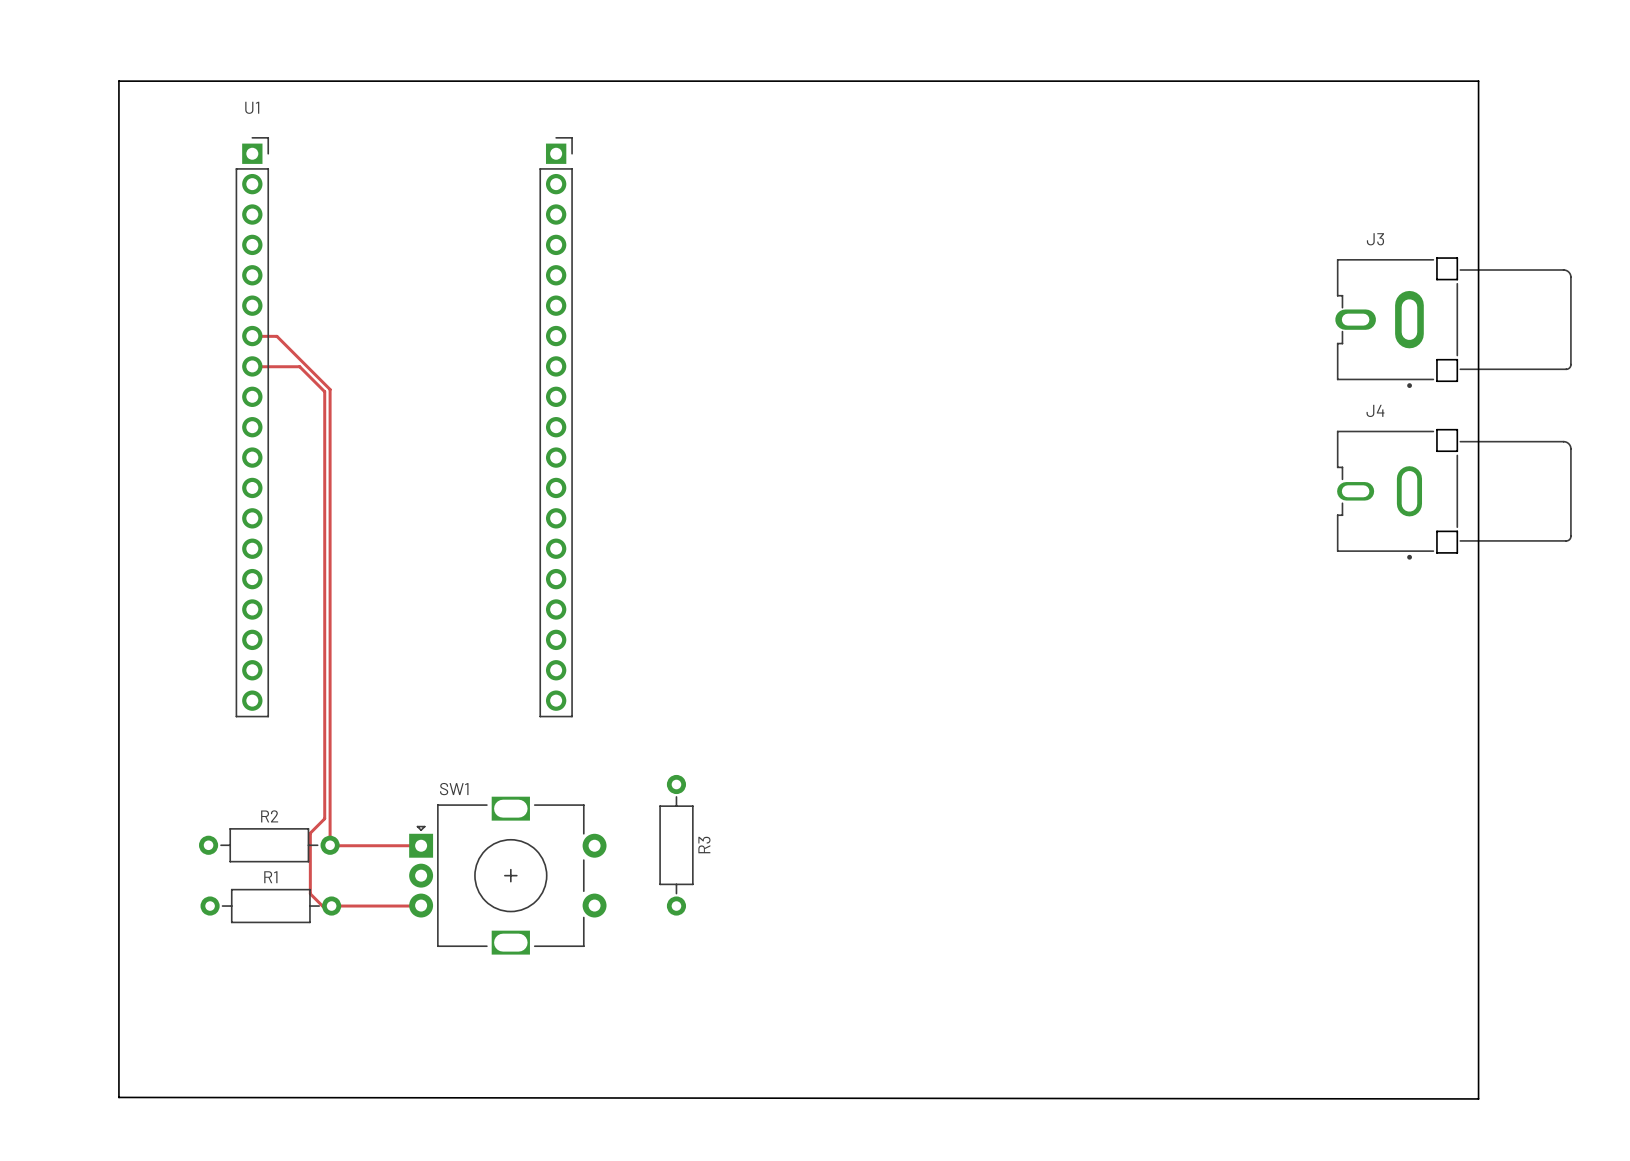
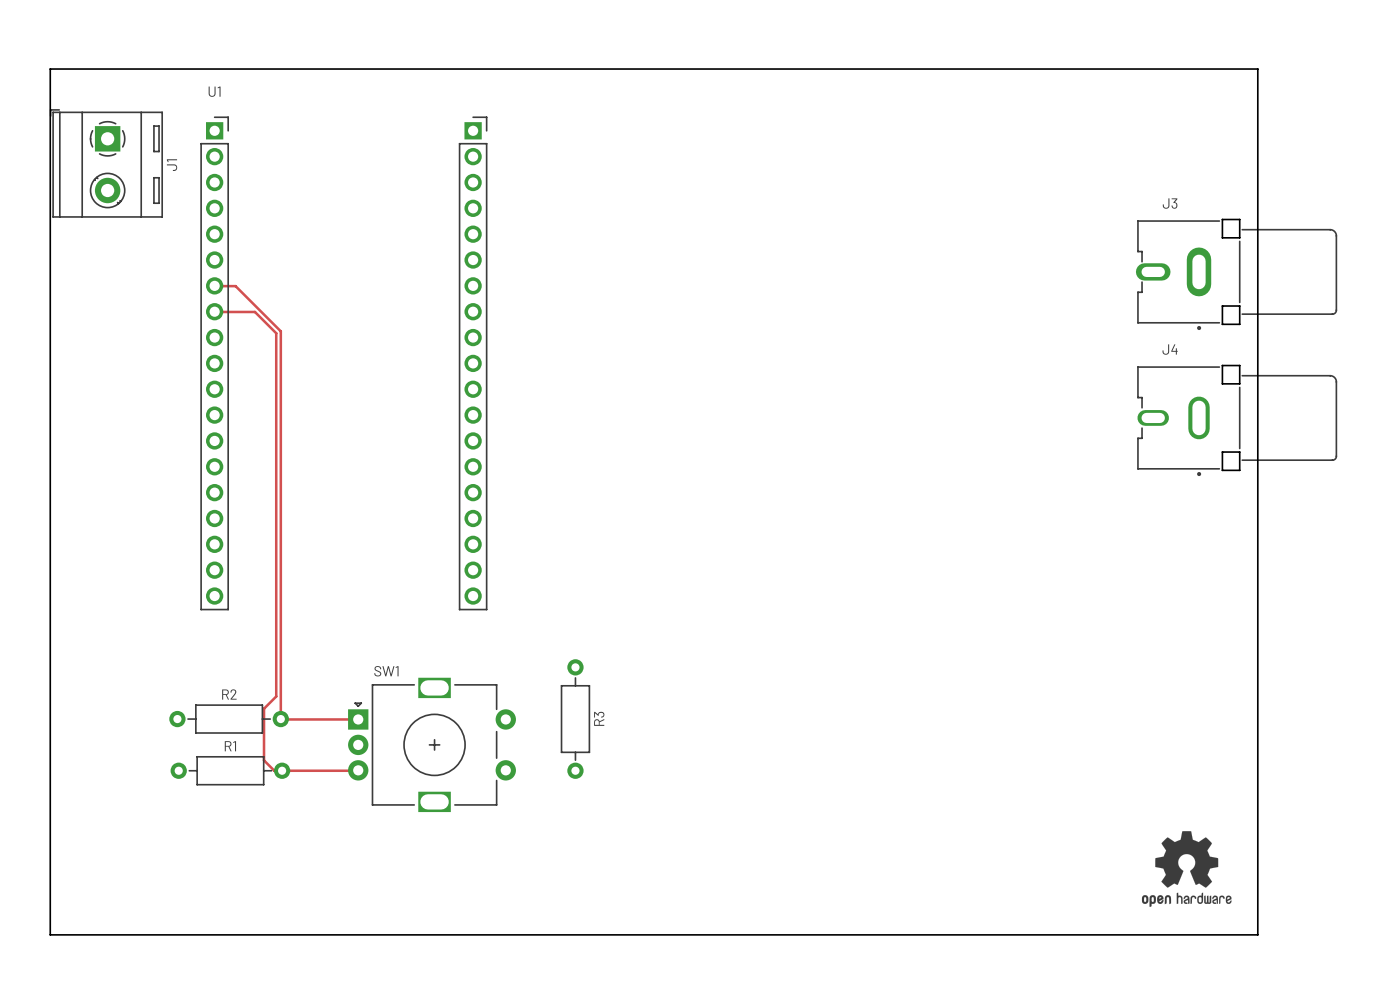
board edge: (118, 81) (118, 1097) (1478, 1098) -> (101, 69) (50, 69) (50, 934) (1257, 934)
J1: none -> (106, 163)
drawing: none -> [1141, 831, 1232, 907]

